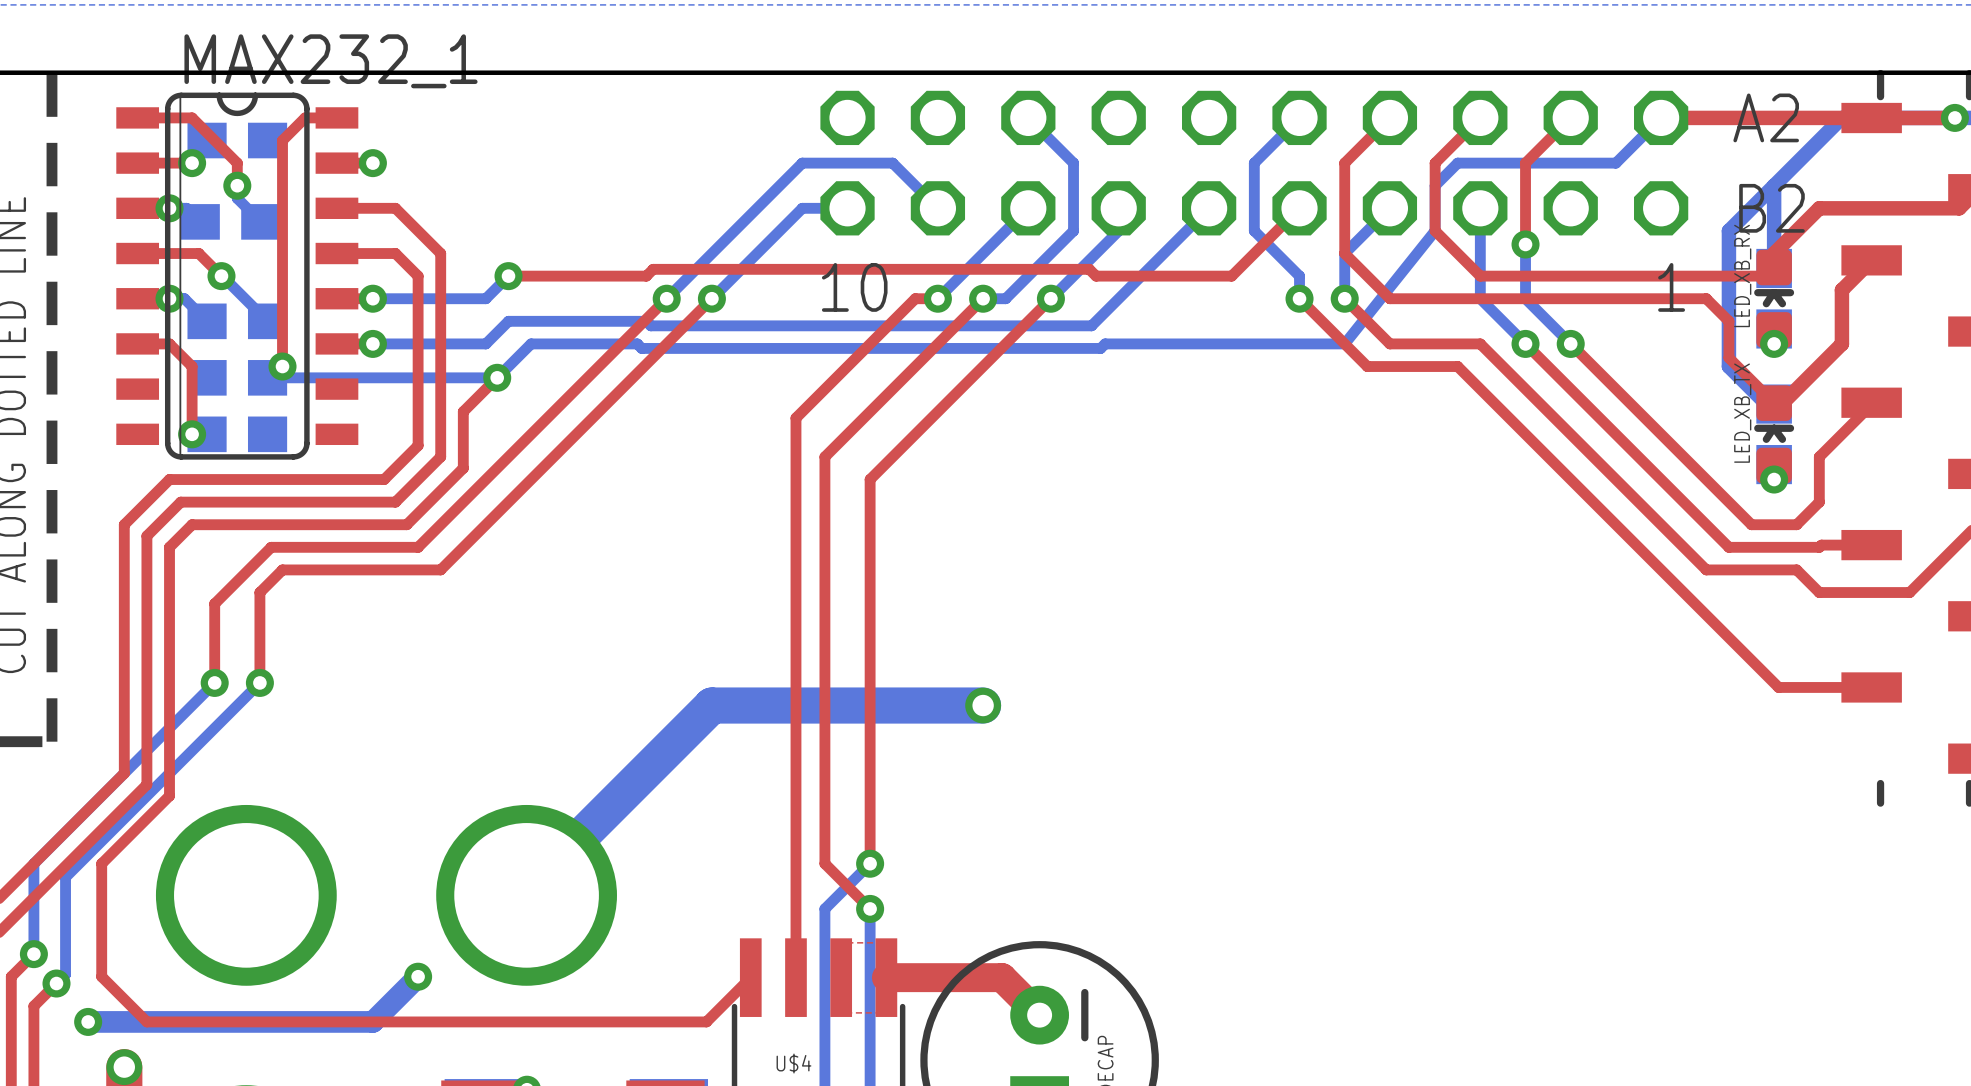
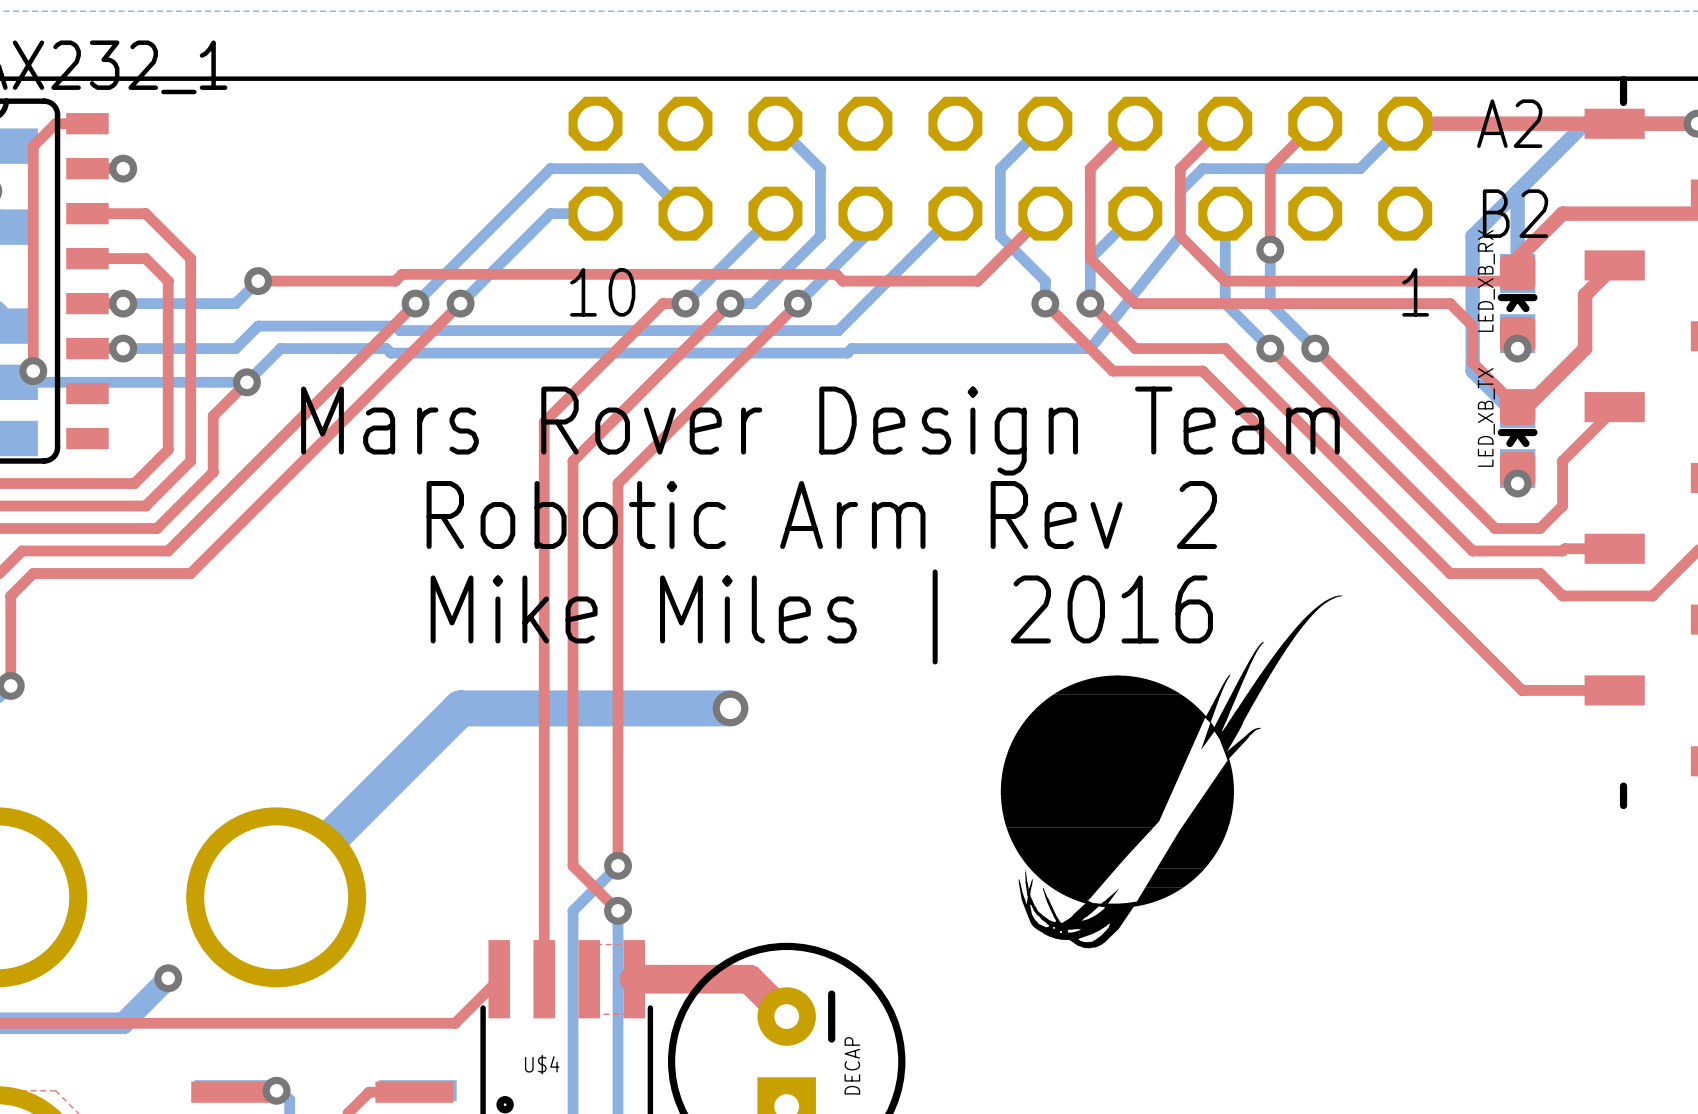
text: none -> Mars Rover Design Team (820, 431)
text: none -> Robotic Arm Rev 2 (821, 515)
drawing: none -> [1000, 595, 1344, 949]
text: none -> Mike Miles | 2016 (821, 616)

